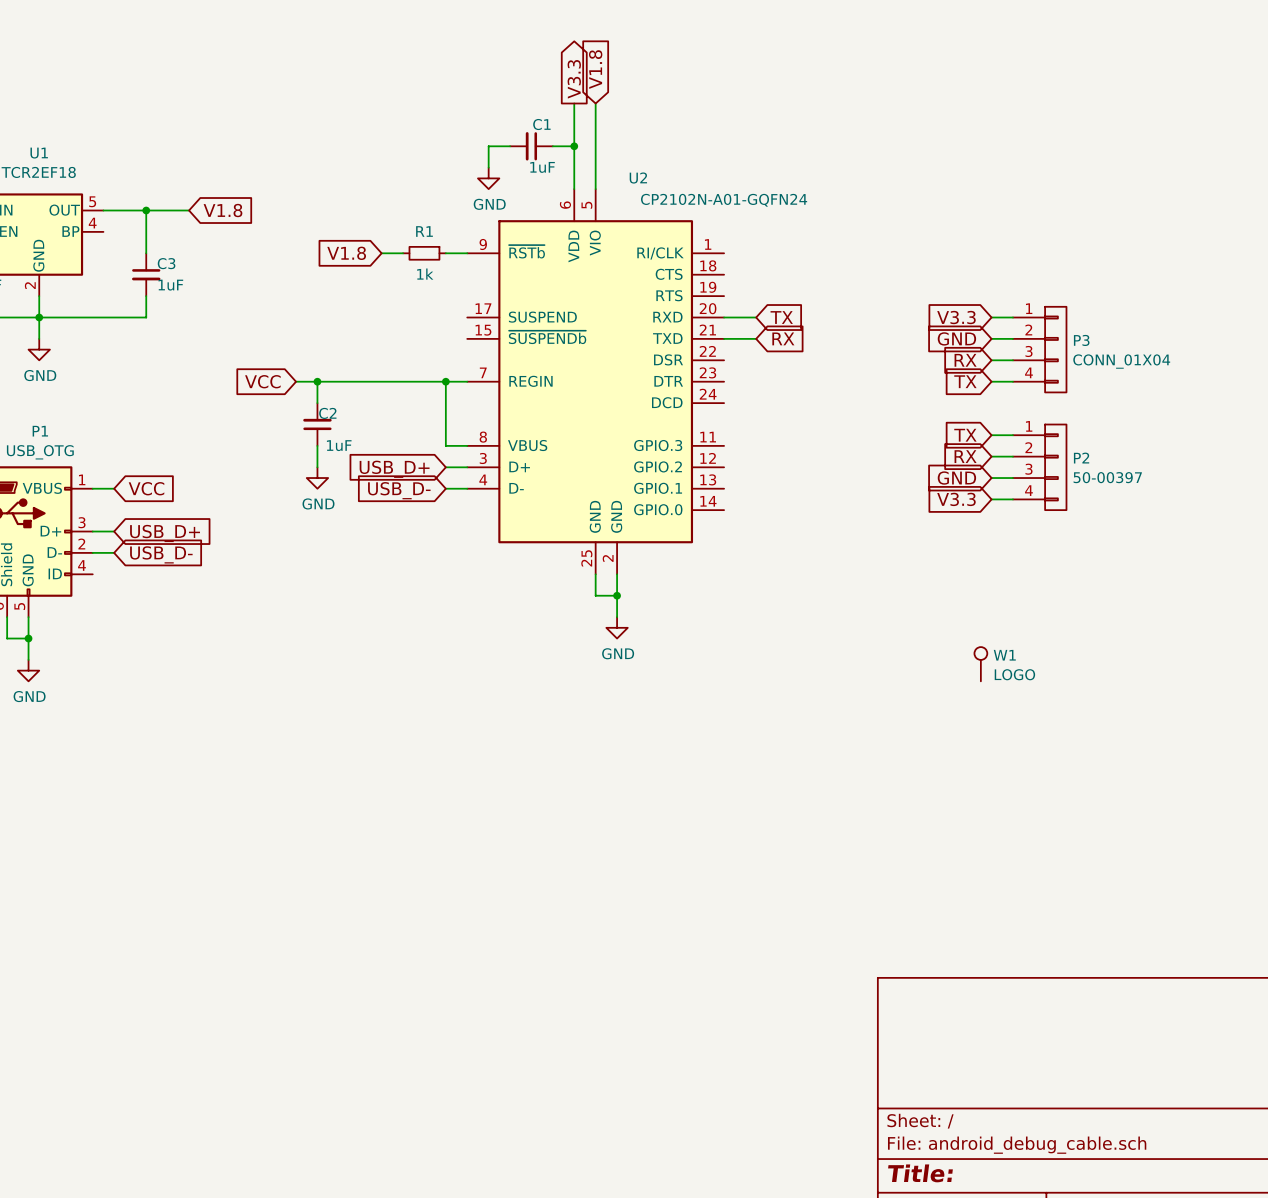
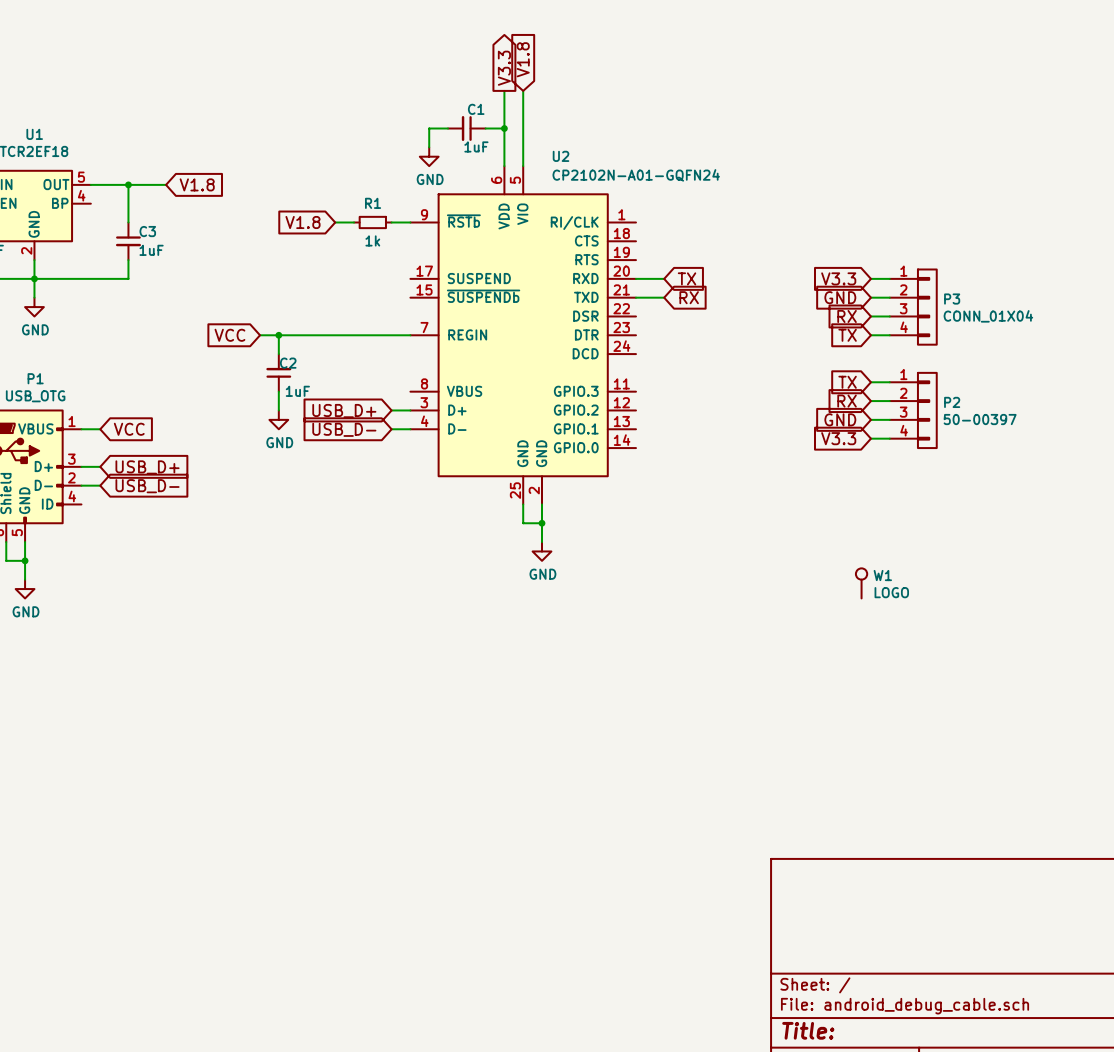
wire: (445, 381) (445, 445) (467, 445) -> none
junction: (445, 381) -> none

